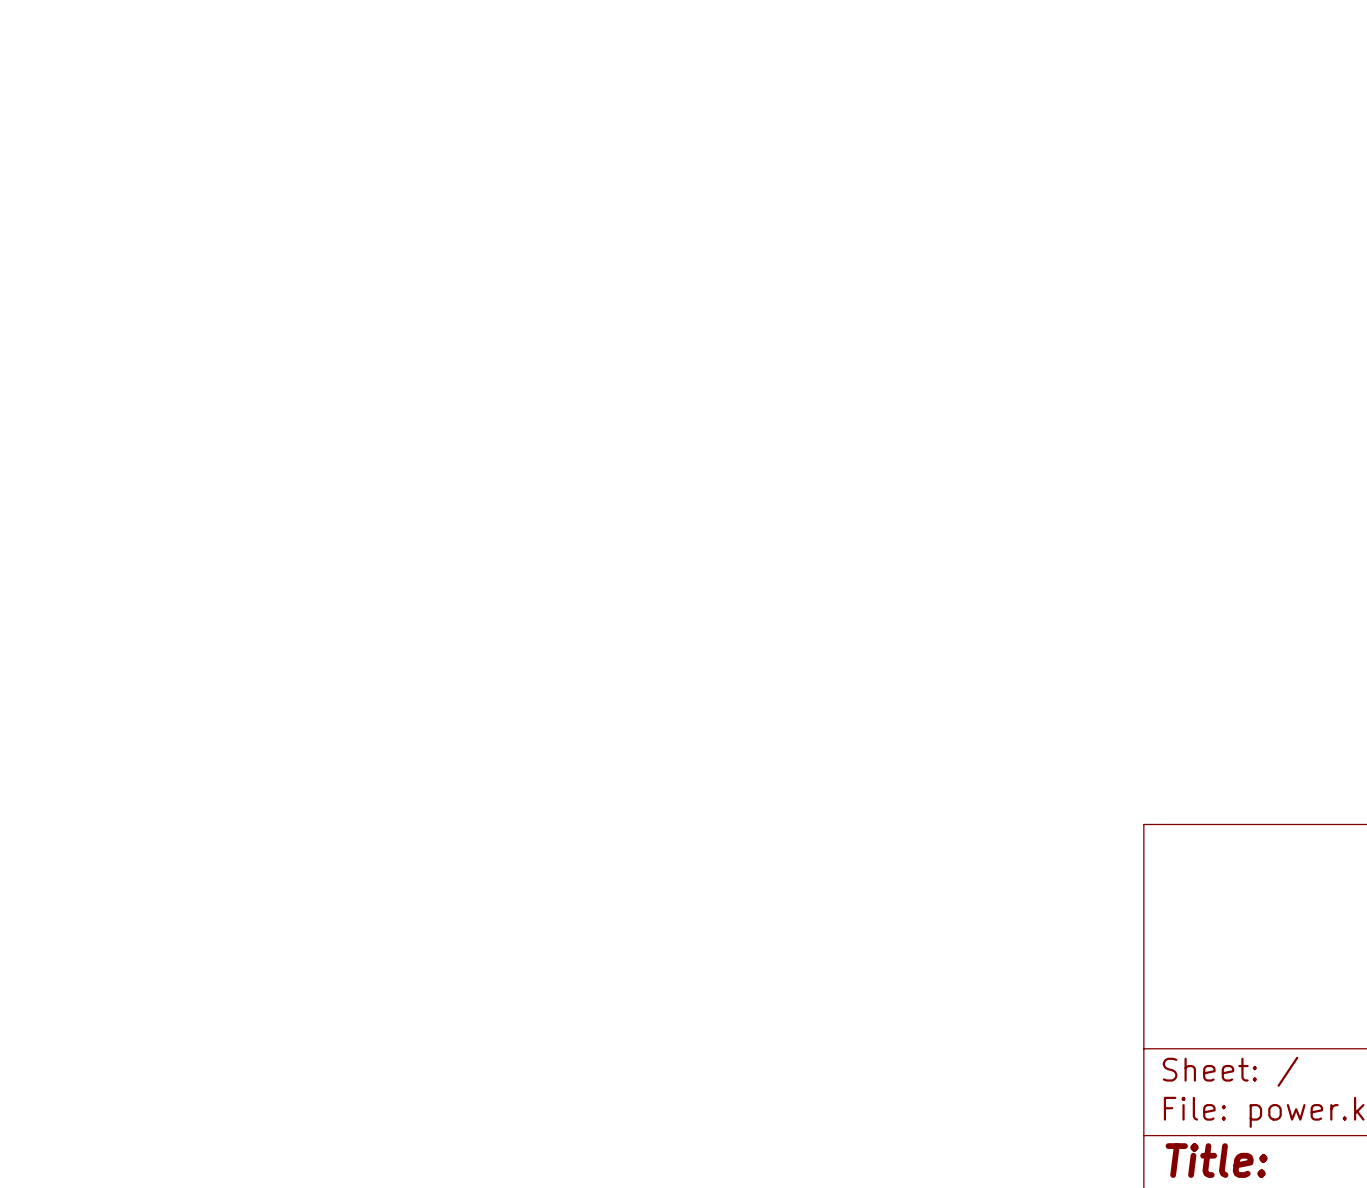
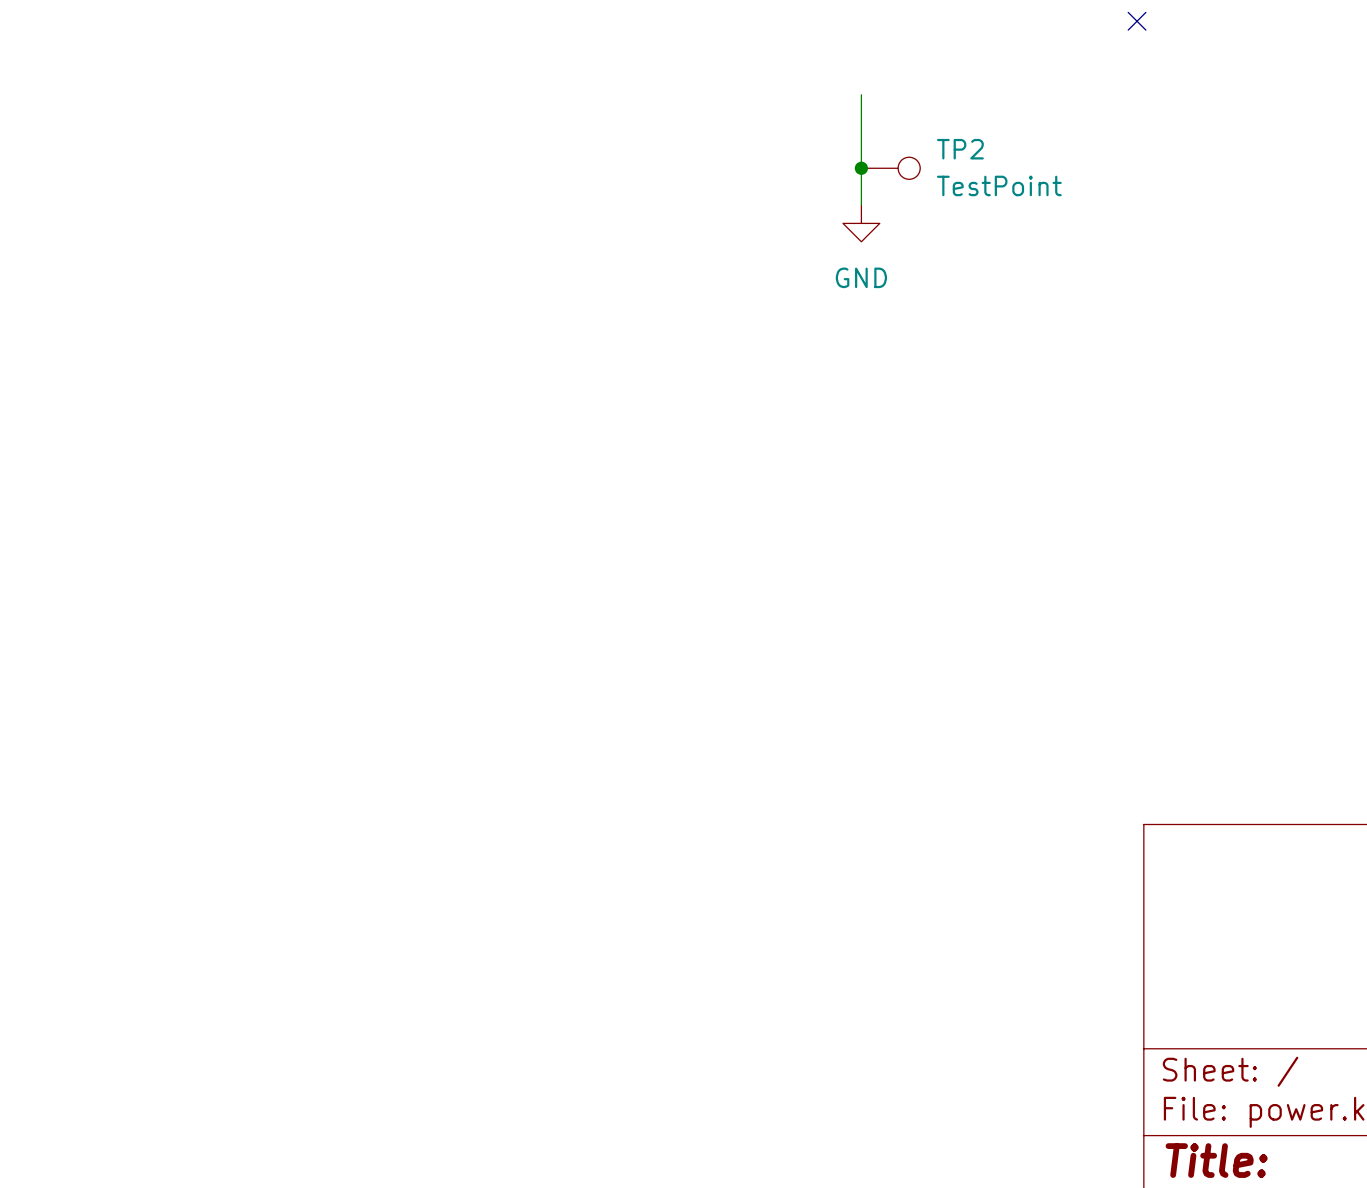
no-connect mark: none -> (1137, 21)
wire: none -> (861, 94) (861, 205)
junction: none -> (861, 168)
TP2: none -> TestPoint (890, 168)
power symbol: none -> GND (861, 223)

